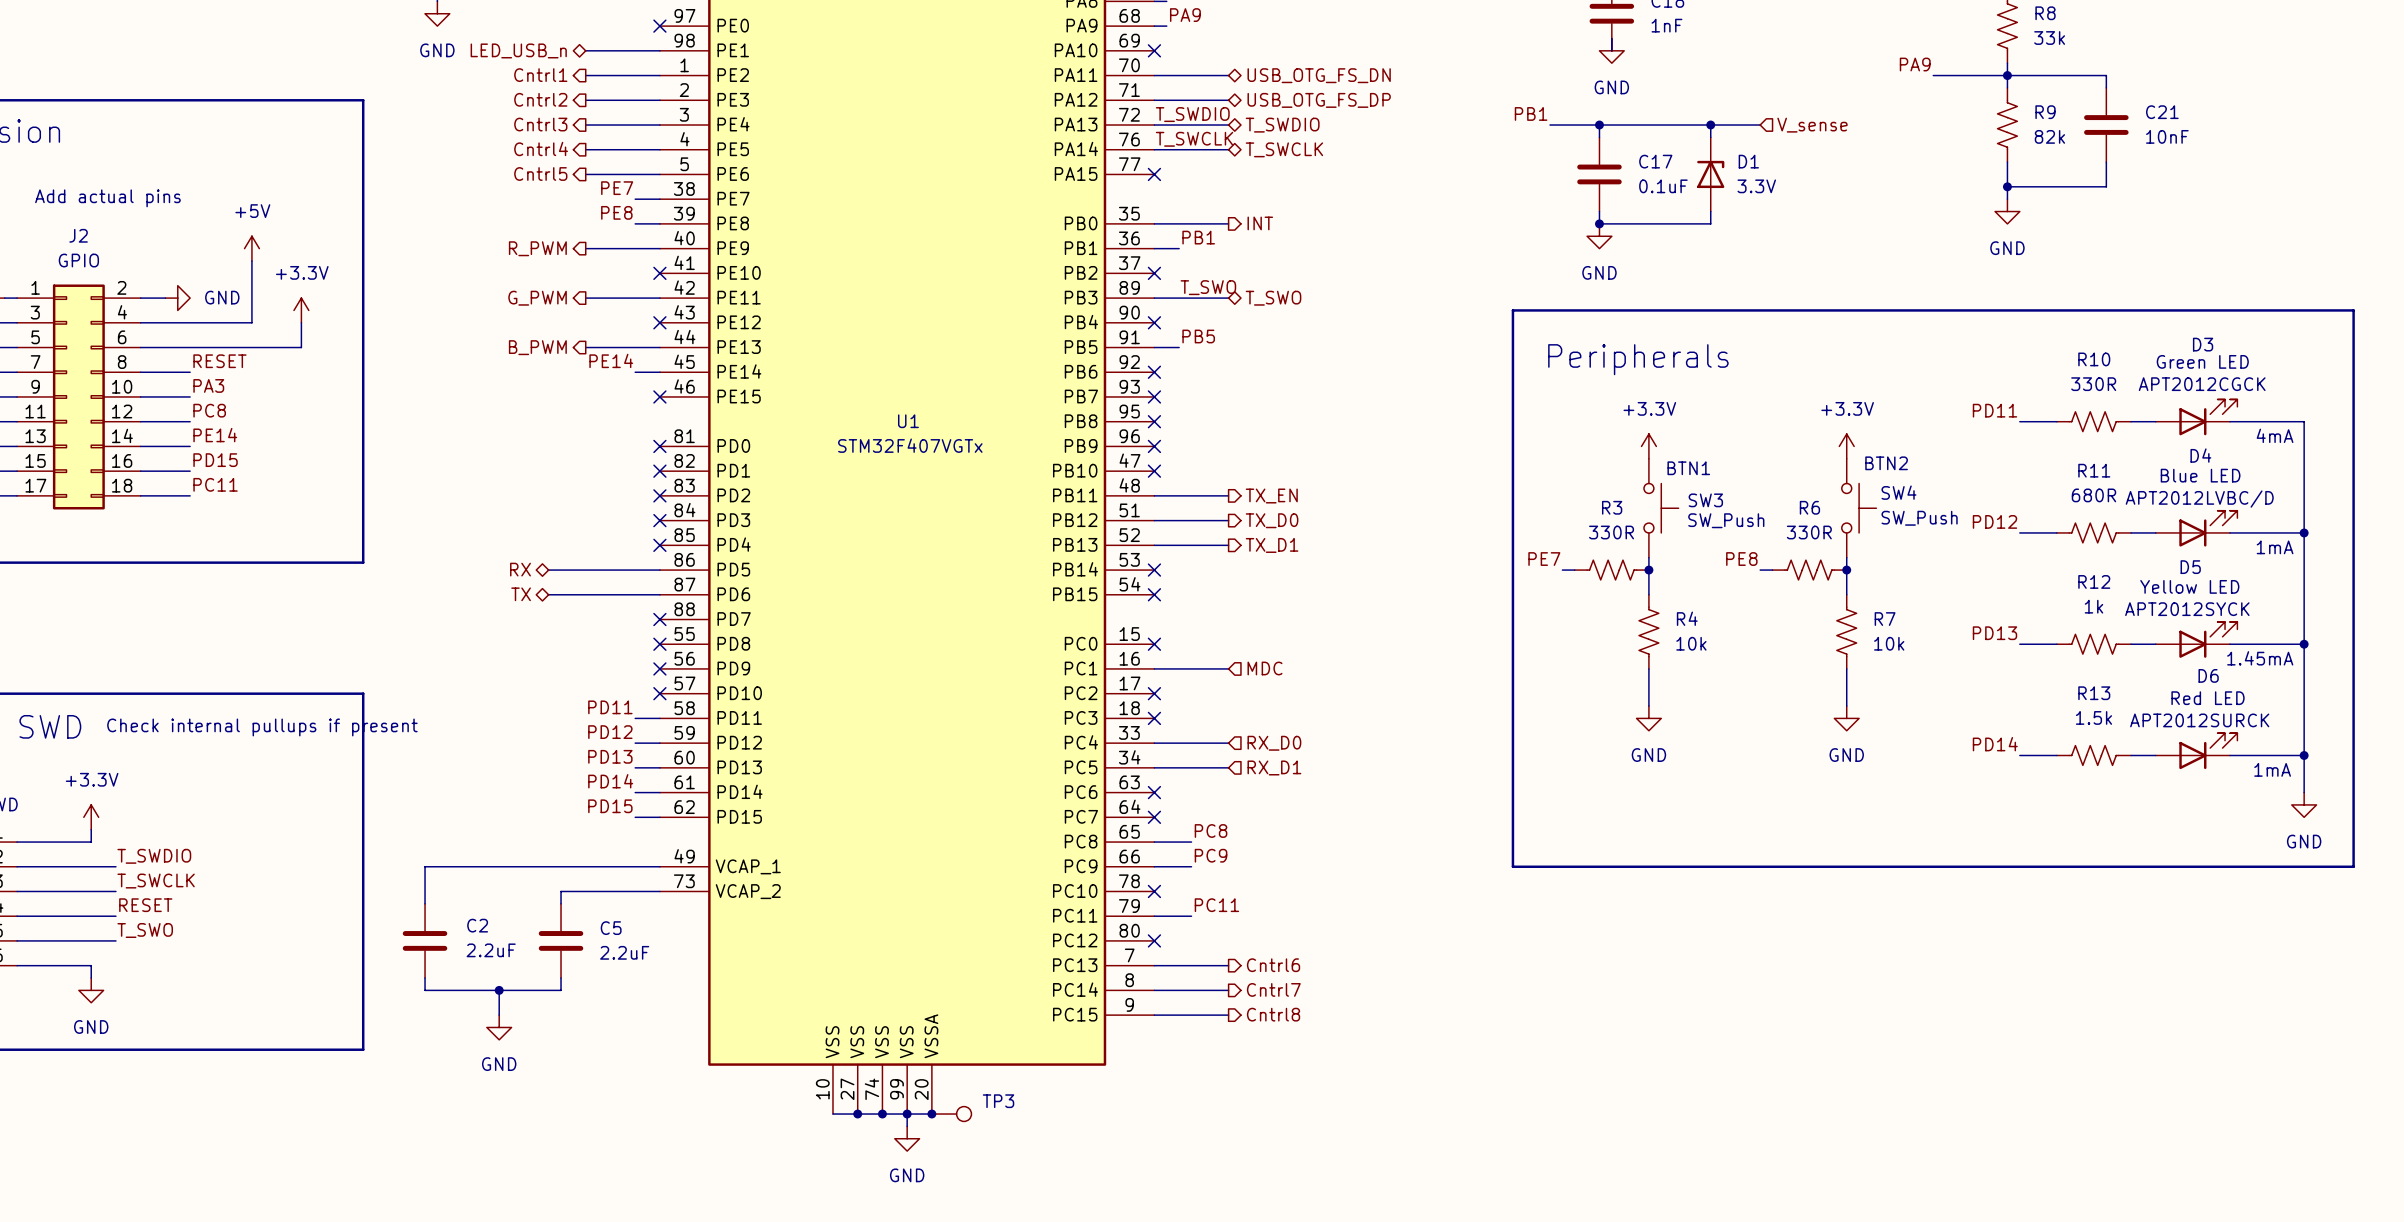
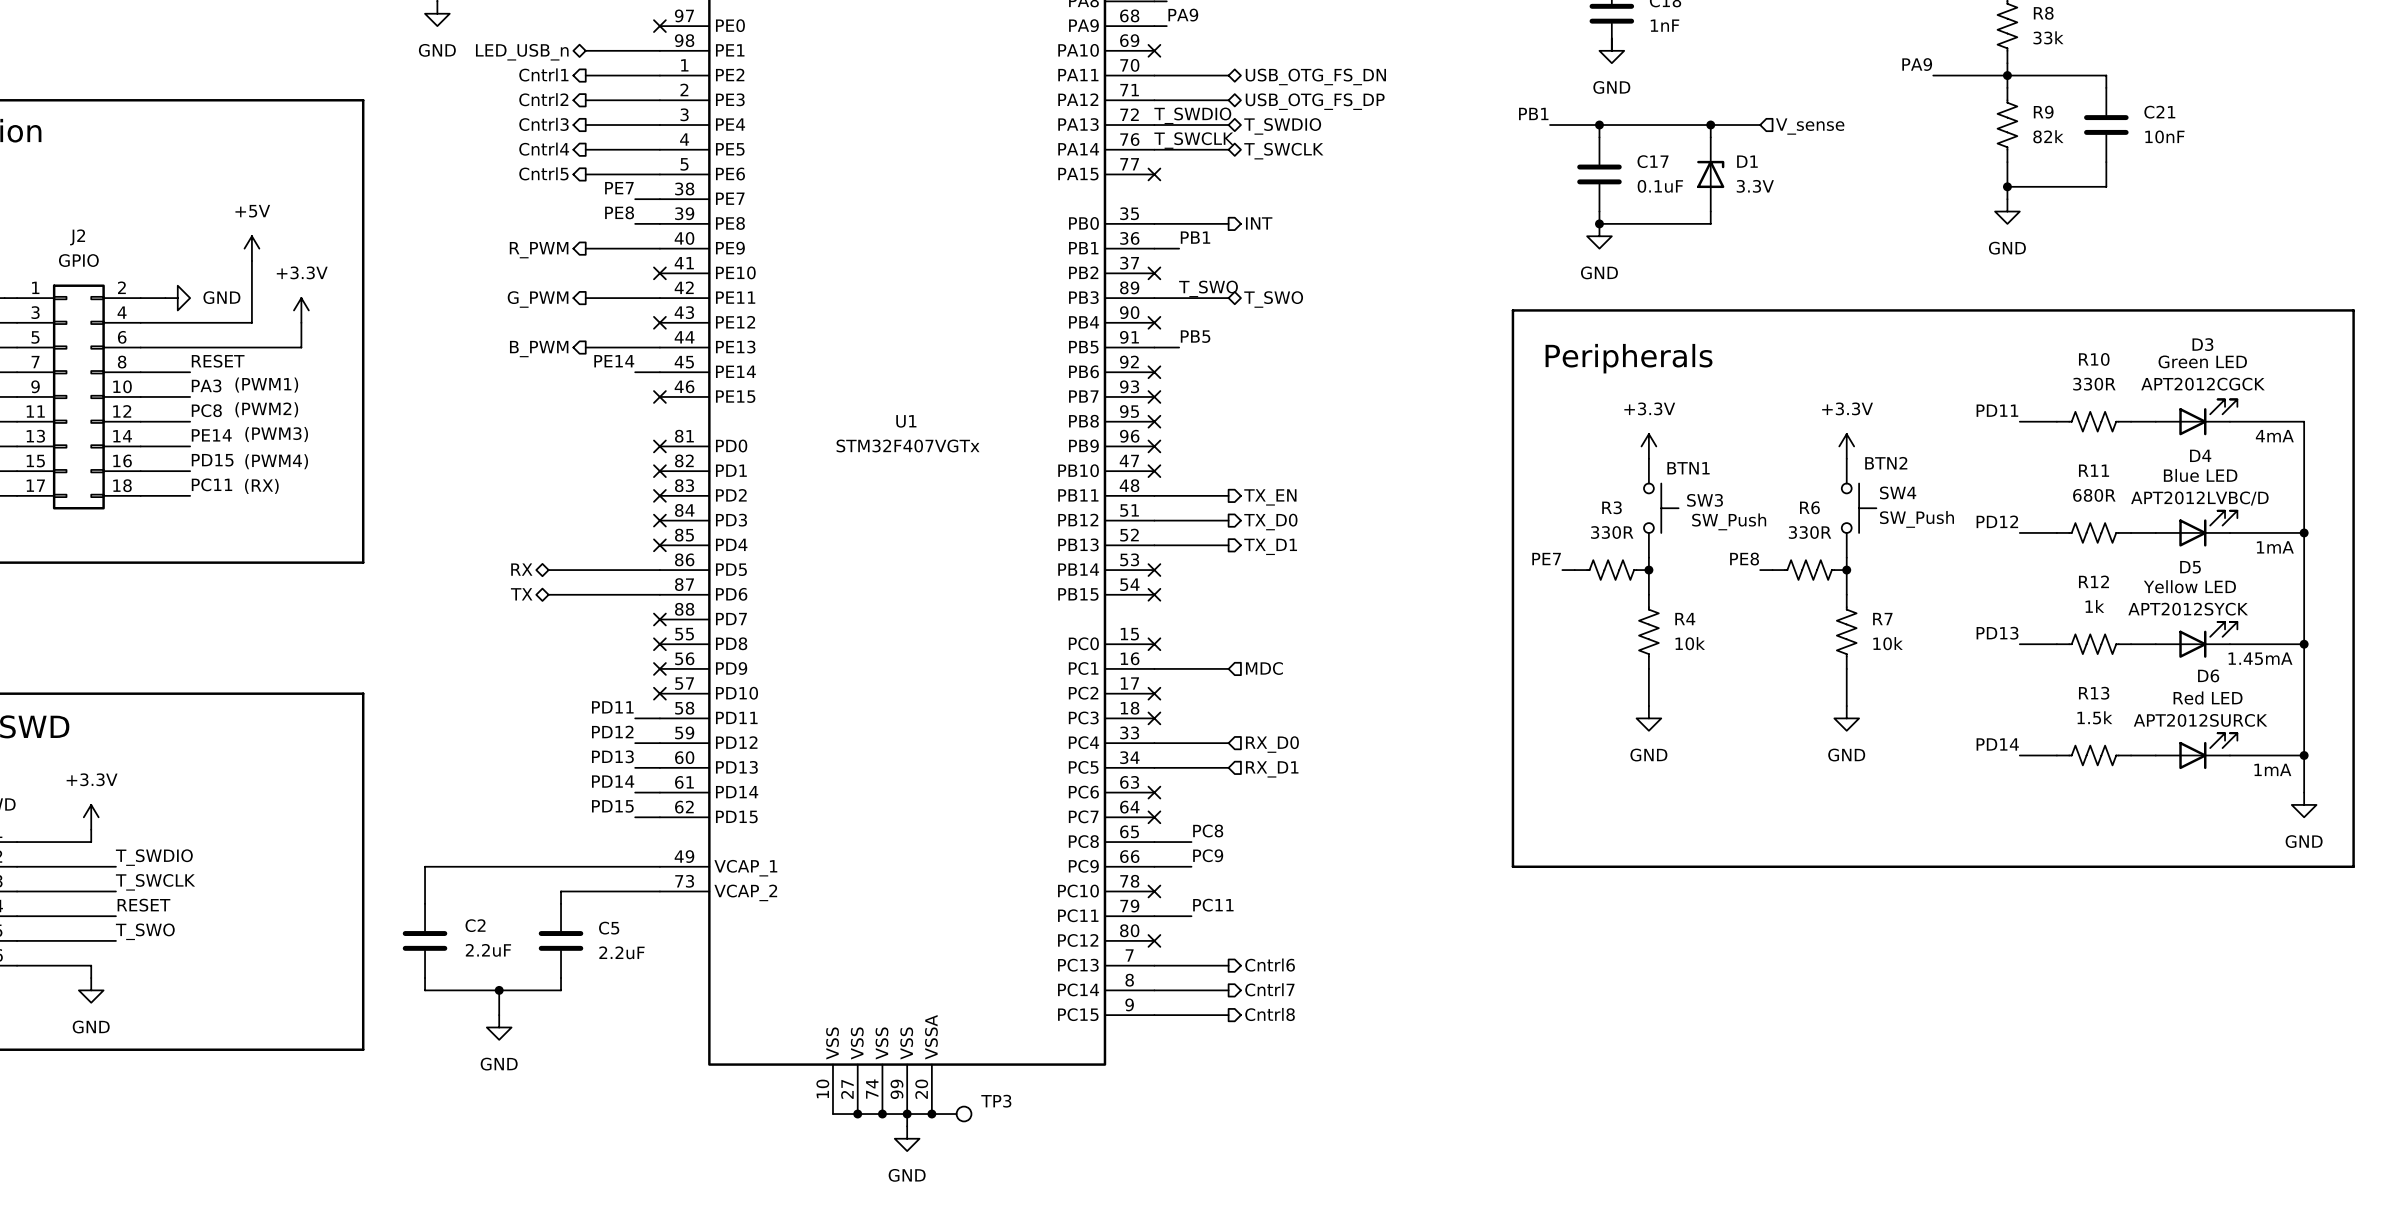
text: Add actual pins (107, 198) -> none
text: none -> (PWM1) (266, 385)
text: none -> (PWM2) (266, 409)
text: none -> (PWM3) (276, 434)
text: none -> (PWM4) (276, 461)
text: none -> (RX) (261, 486)
text: Check internal pullups if present (262, 727) -> none

